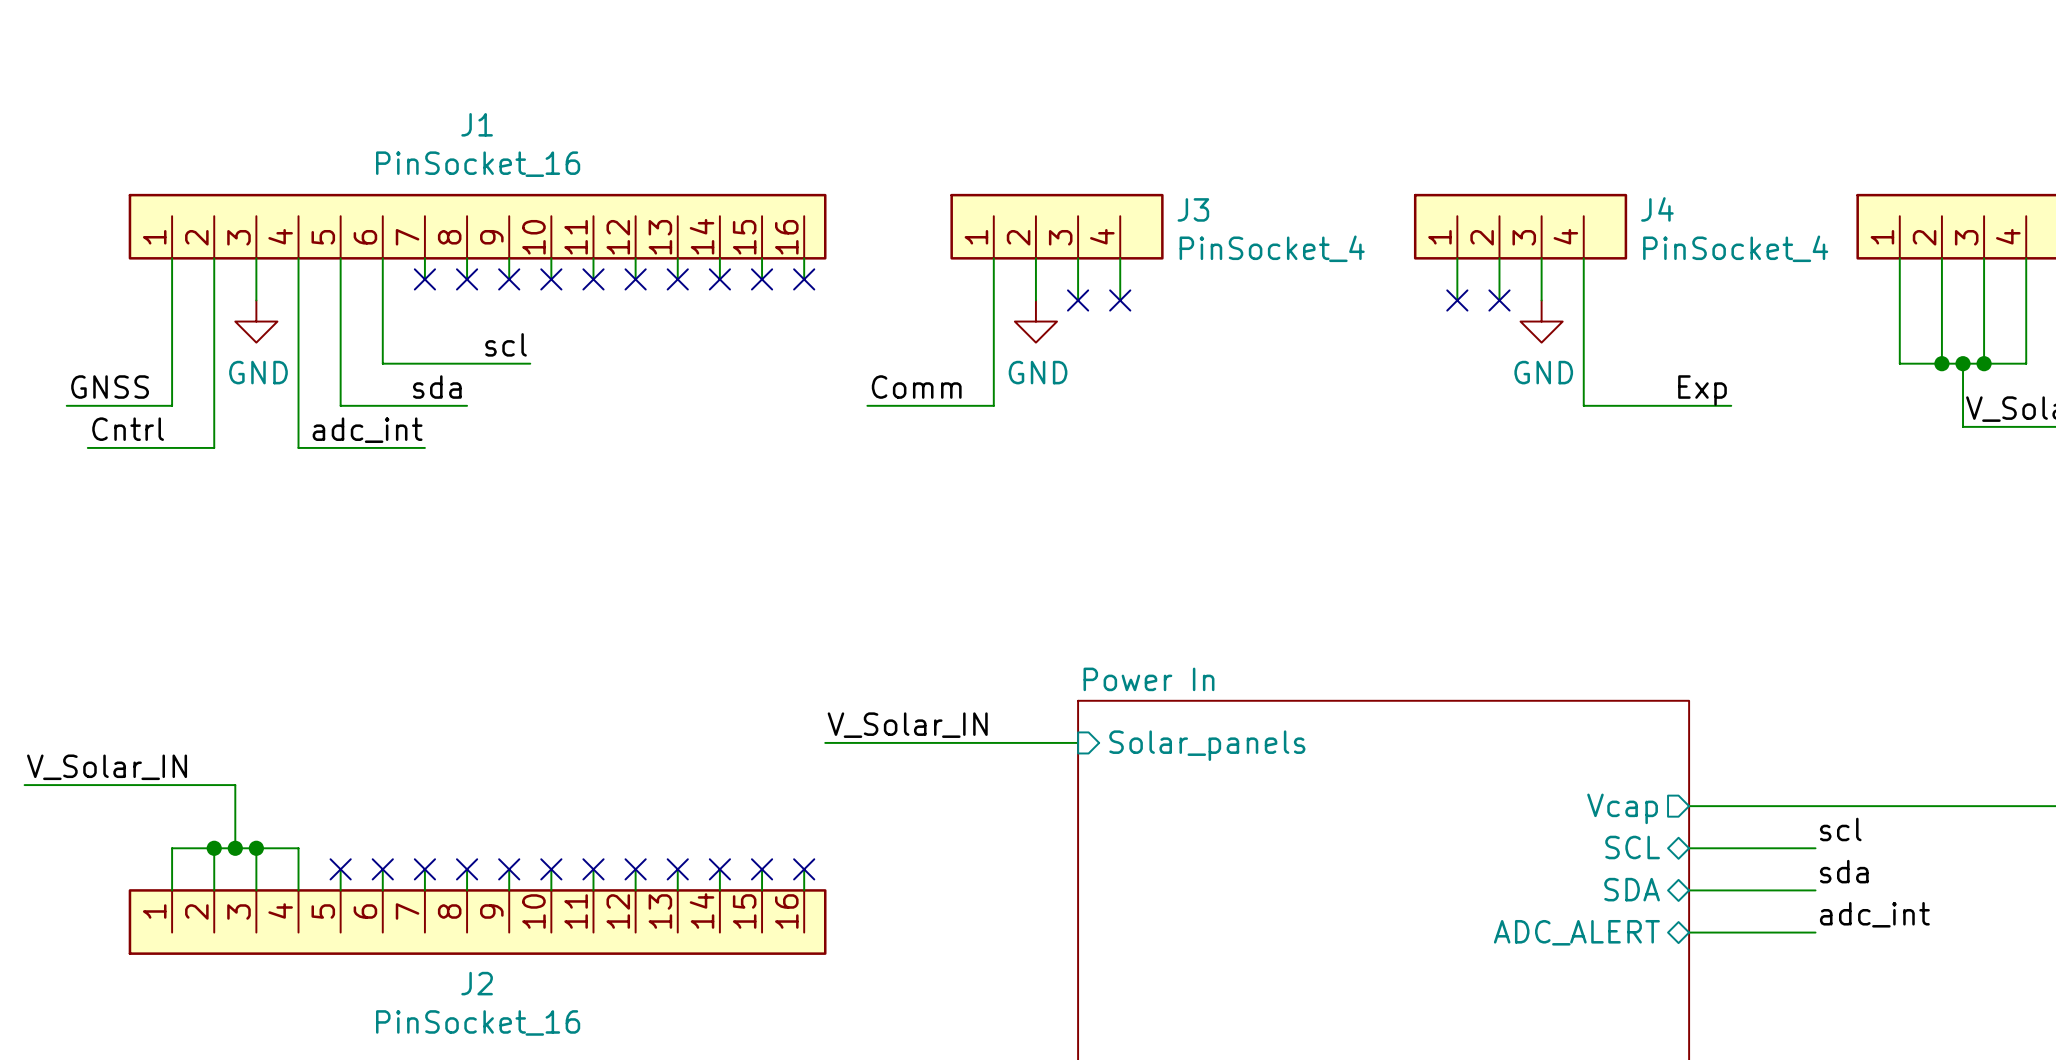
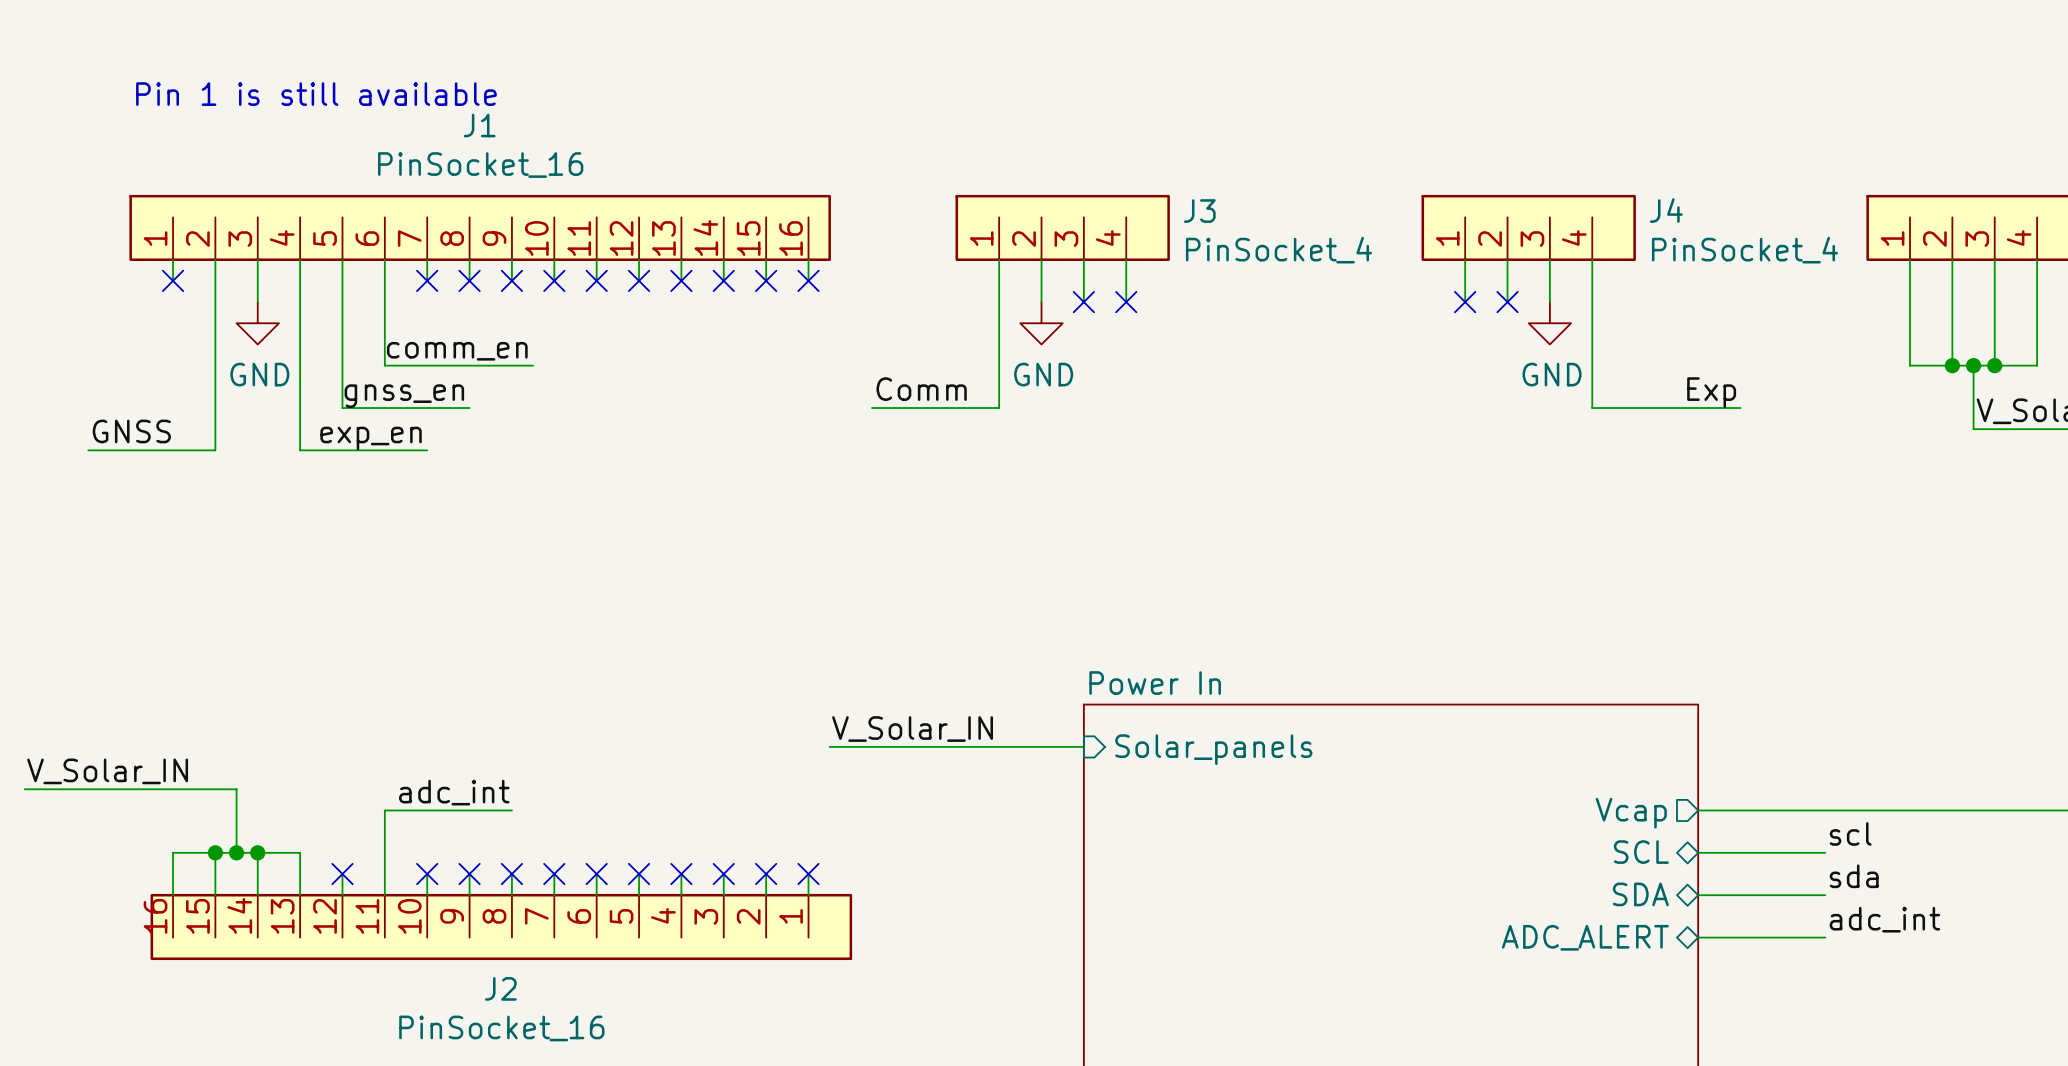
text: none -> Pin 1 is still available (316, 94)
wire: (172, 279) (172, 405) (66, 405) -> none
no-connect mark: none -> (173, 280)
label: scl (506, 344) -> comm_en (457, 351)
label: GNSS (110, 387) -> none
label: sda (437, 387) -> gnss_en (404, 396)
label: Cntrl (128, 429) -> GNSS (131, 431)
label: adc_int (367, 430) -> exp_en (371, 438)
label: none -> adc_int (454, 792)
wire: none -> (511, 810) (384, 810) (384, 874)
no-connect mark: (382, 869) -> none
J2 flip: as is (477, 922) -> left-right (501, 926)

